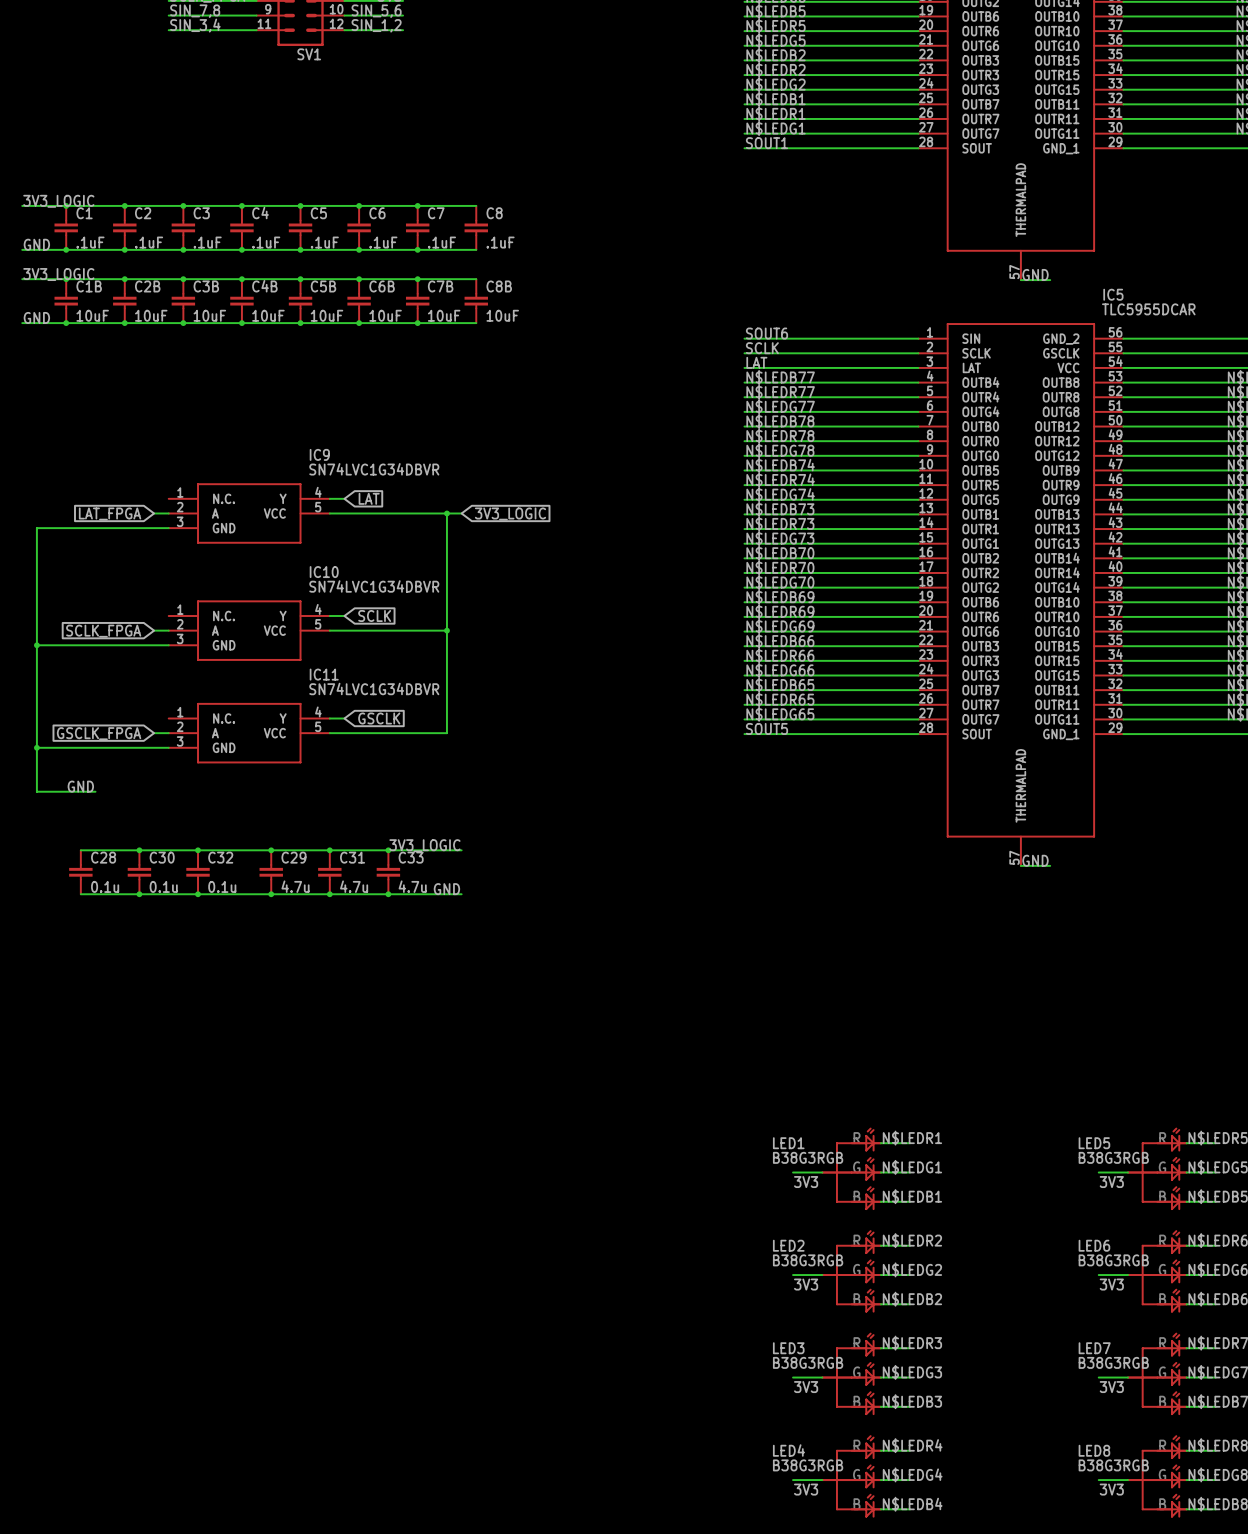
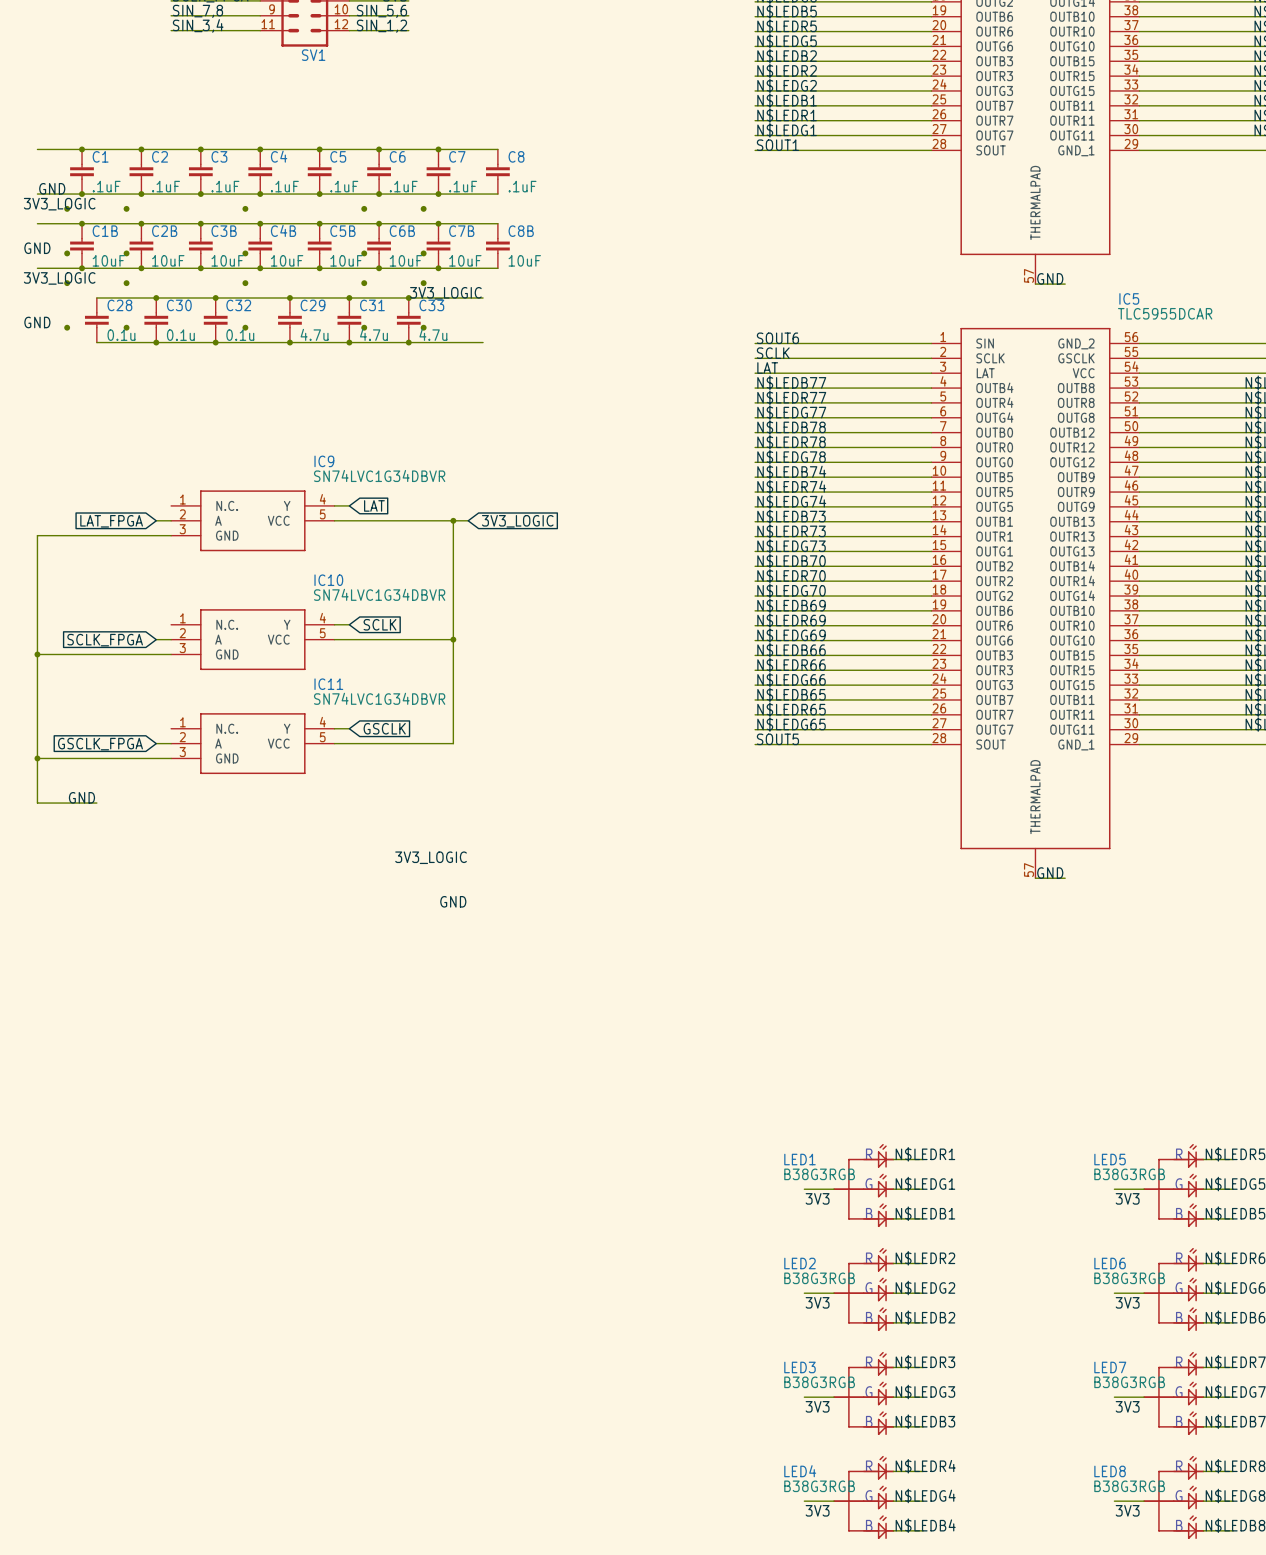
junction: none -> (82, 149)
junction: none -> (141, 149)
junction: none -> (200, 149)
junction: none -> (260, 149)
junction: none -> (319, 149)
junction: none -> (379, 149)
junction: none -> (438, 149)
label: none -> GND (52, 188)
junction: none -> (82, 194)
junction: none -> (141, 194)
junction: none -> (200, 194)
junction: none -> (260, 194)
junction: none -> (319, 194)
junction: none -> (379, 194)
junction: none -> (438, 194)
wire: (22, 205) (476, 205) -> (37, 149) (497, 149)
junction: (183, 205) -> none
junction: (300, 205) -> none
junction: none -> (82, 223)
junction: none -> (141, 223)
junction: none -> (200, 223)
junction: none -> (260, 223)
junction: none -> (319, 223)
junction: none -> (379, 223)
junction: none -> (438, 223)
C1 position: (66, 227) -> (82, 171)
C2 position: (124, 227) -> (141, 171)
C3 position: (183, 227) -> (200, 171)
C4 position: (241, 227) -> (260, 171)
C5 position: (300, 227) -> (319, 171)
C6 position: (359, 227) -> (379, 171)
C7 position: (417, 227) -> (438, 171)
C8 position: (476, 227) -> (497, 171)
wire: (22, 249) (476, 249) -> (37, 194) (497, 194)
junction: (183, 249) -> none
junction: (300, 249) -> none
junction: none -> (82, 268)
junction: none -> (141, 268)
junction: none -> (200, 268)
junction: none -> (260, 268)
junction: none -> (319, 268)
junction: none -> (379, 268)
junction: none -> (438, 268)
wire: (22, 279) (476, 279) -> (37, 223) (497, 223)
junction: (183, 279) -> none
junction: (300, 279) -> none
label: none -> 3V3_LOGIC (445, 293)
wire: none -> (96, 297) (483, 297)
junction: none -> (156, 297)
junction: none -> (215, 297)
junction: none -> (289, 297)
junction: none -> (349, 297)
junction: none -> (408, 297)
C1B position: (66, 301) -> (82, 246)
C2B position: (124, 301) -> (141, 246)
C3B position: (183, 301) -> (200, 246)
C4B position: (241, 301) -> (260, 246)
C5B position: (300, 301) -> (319, 246)
C6B position: (359, 301) -> (379, 246)
C7B position: (417, 301) -> (438, 246)
C8B position: (476, 301) -> (497, 246)
wire: (22, 323) (476, 323) -> (37, 268) (497, 268)
junction: (183, 323) -> none
junction: (300, 323) -> none
wire: none -> (96, 342) (483, 342)
junction: none -> (156, 342)
junction: none -> (215, 342)
junction: none -> (289, 342)
junction: none -> (349, 342)
junction: none -> (408, 342)
wire: (80, 850) (461, 850) -> none
junction: (139, 850) -> none
junction: (198, 850) -> none
junction: (271, 850) -> none
junction: (329, 850) -> none
junction: (388, 850) -> none
C28 position: (80, 872) -> (96, 320)
C30 position: (139, 872) -> (156, 320)
C32 position: (198, 872) -> (215, 320)
C29 position: (271, 872) -> (289, 320)
C31 position: (329, 872) -> (349, 320)
C33 position: (388, 872) -> (408, 320)
wire: (80, 894) (461, 894) -> none
junction: (139, 894) -> none
junction: (198, 894) -> none
junction: (271, 894) -> none
junction: (329, 894) -> none
junction: (388, 894) -> none

